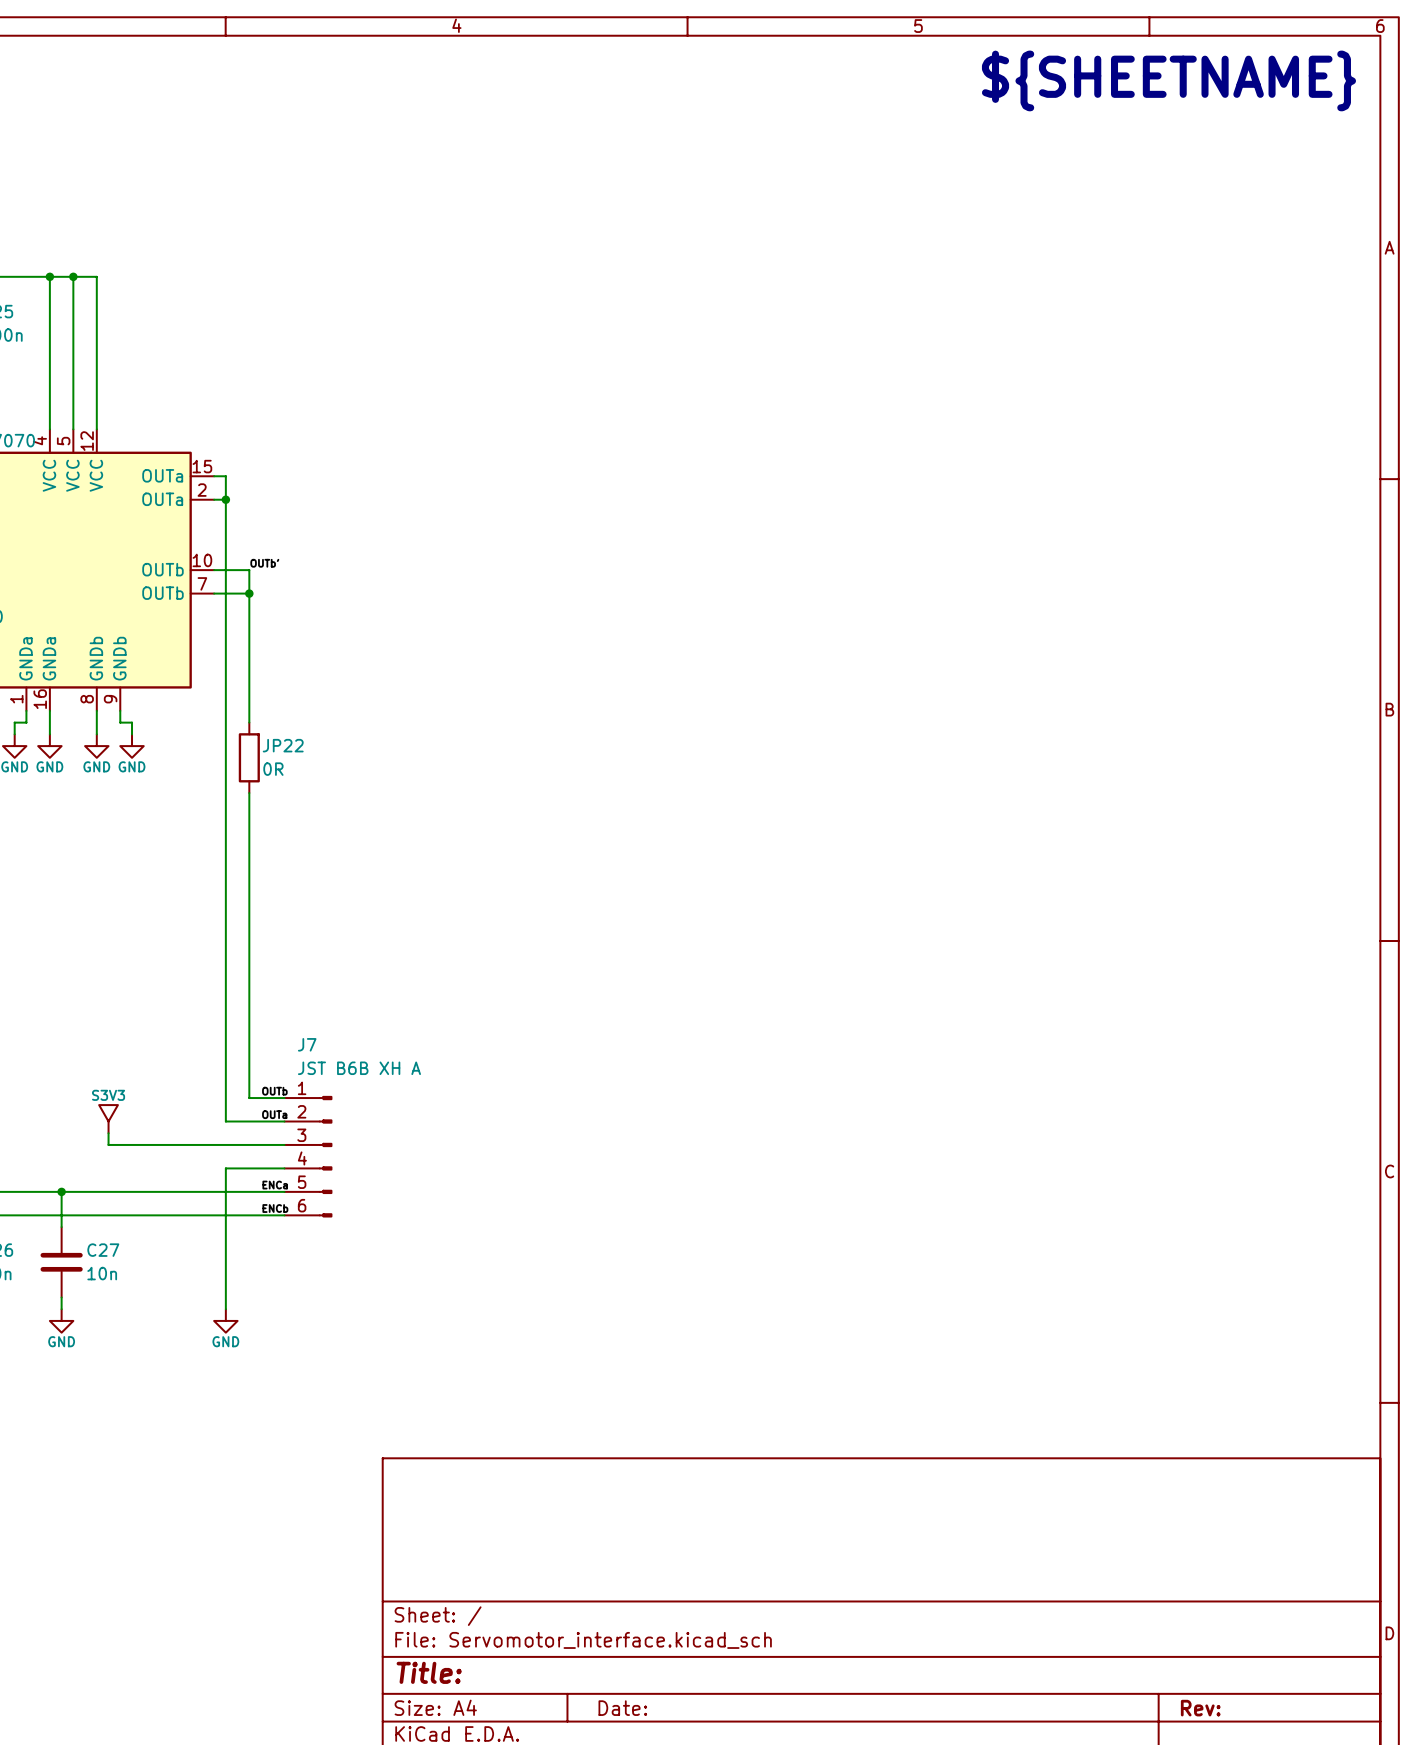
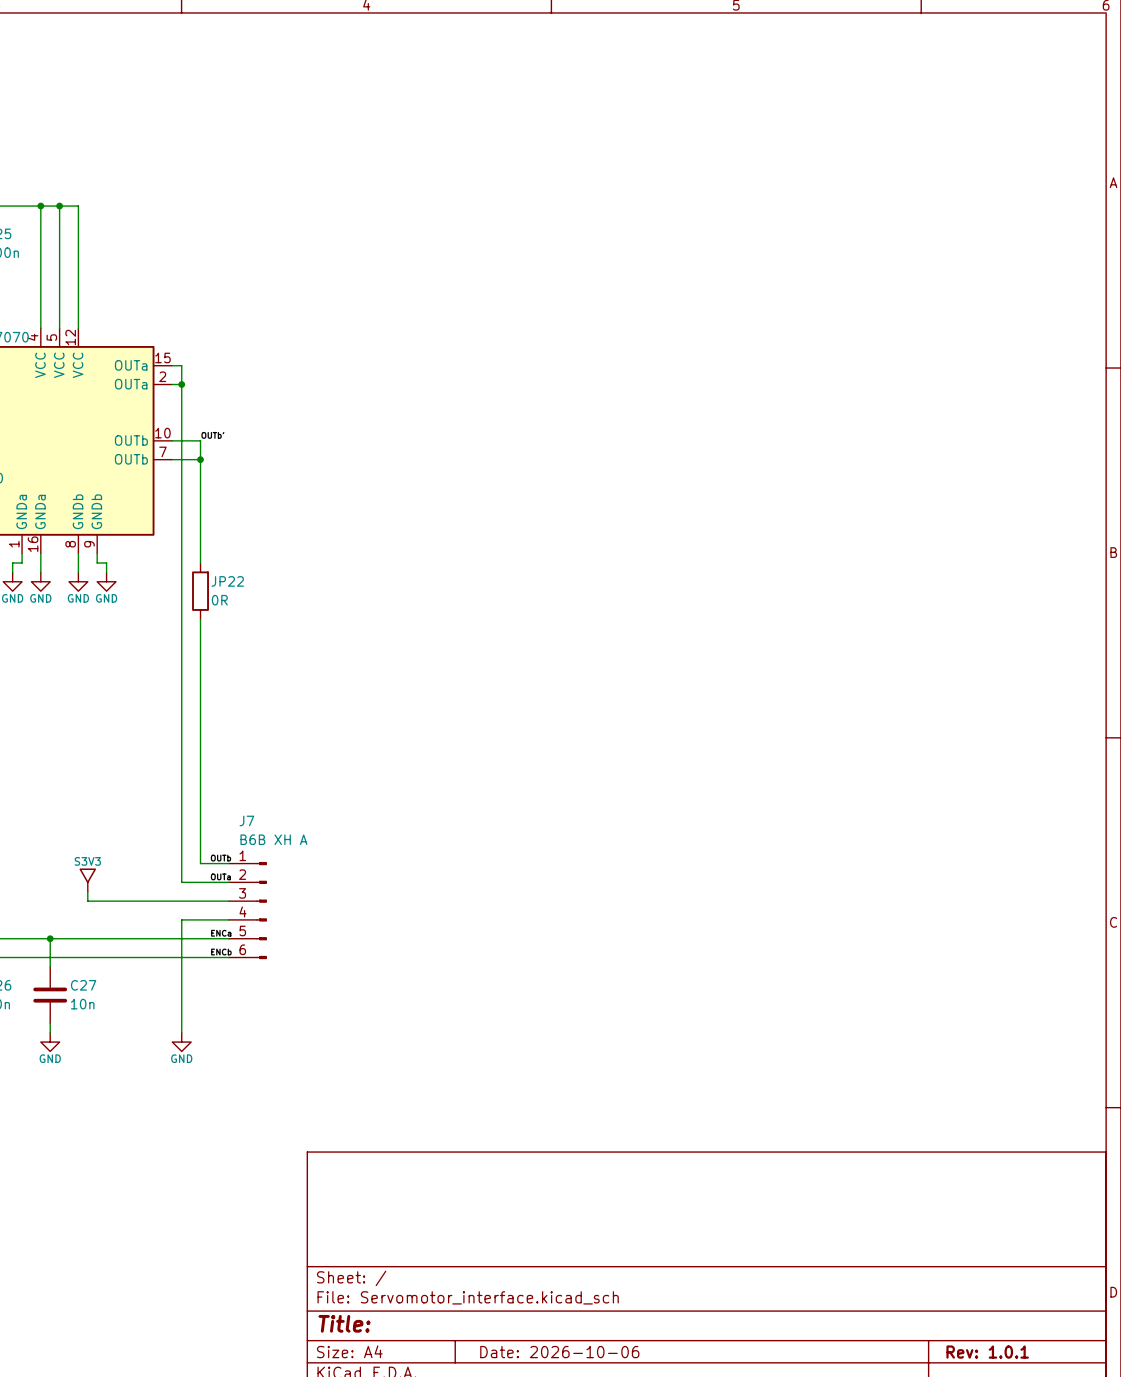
text: ${SHEETNAME} (1168, 80) -> none
J7 value: JST B6B XH A (359, 1068) -> B6B XH A (273, 839)
title block: Date: (622, 1708) -> Date: 2026-10-06 (559, 1352)
title block: Rev: (1200, 1708) -> Rev: 1.0.1 (987, 1352)

